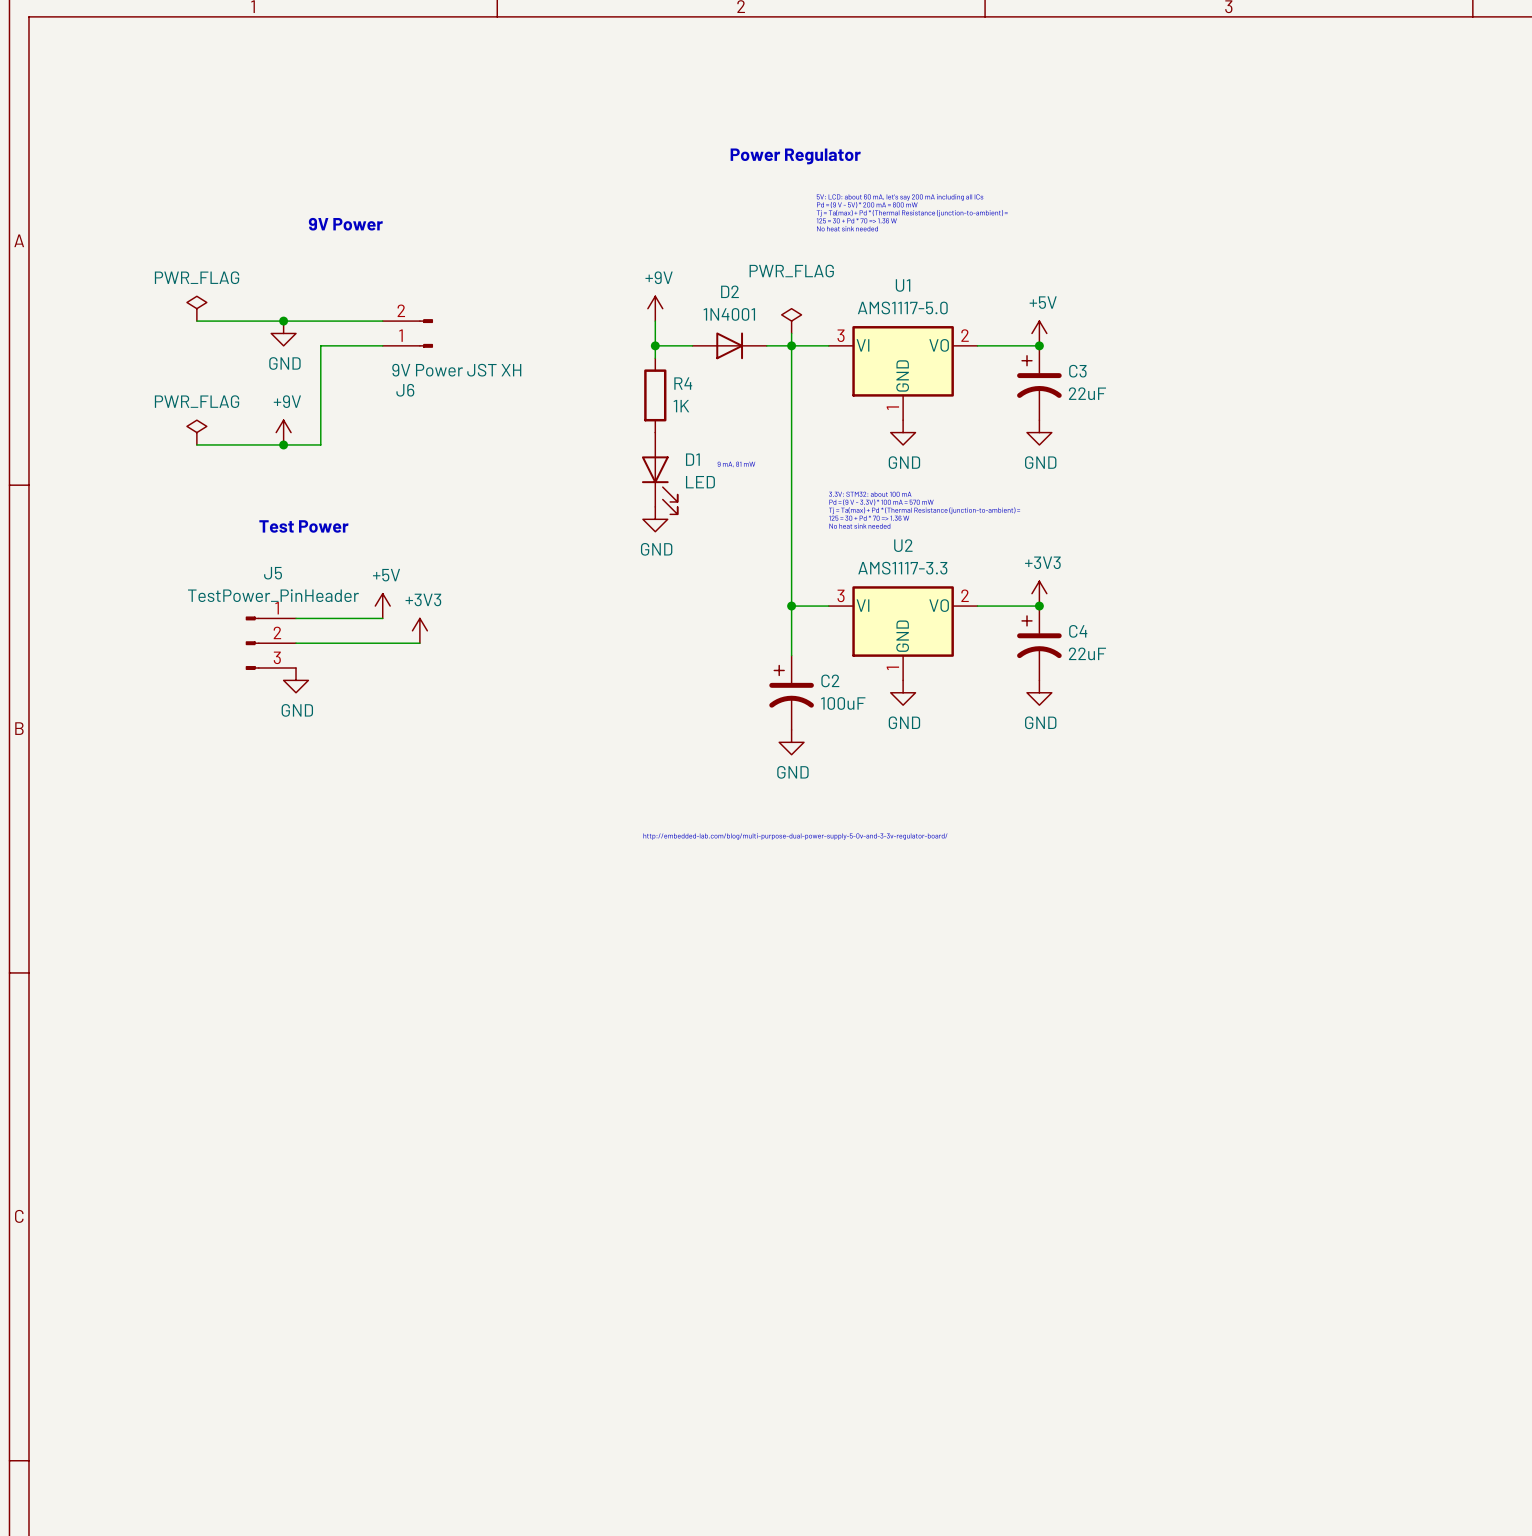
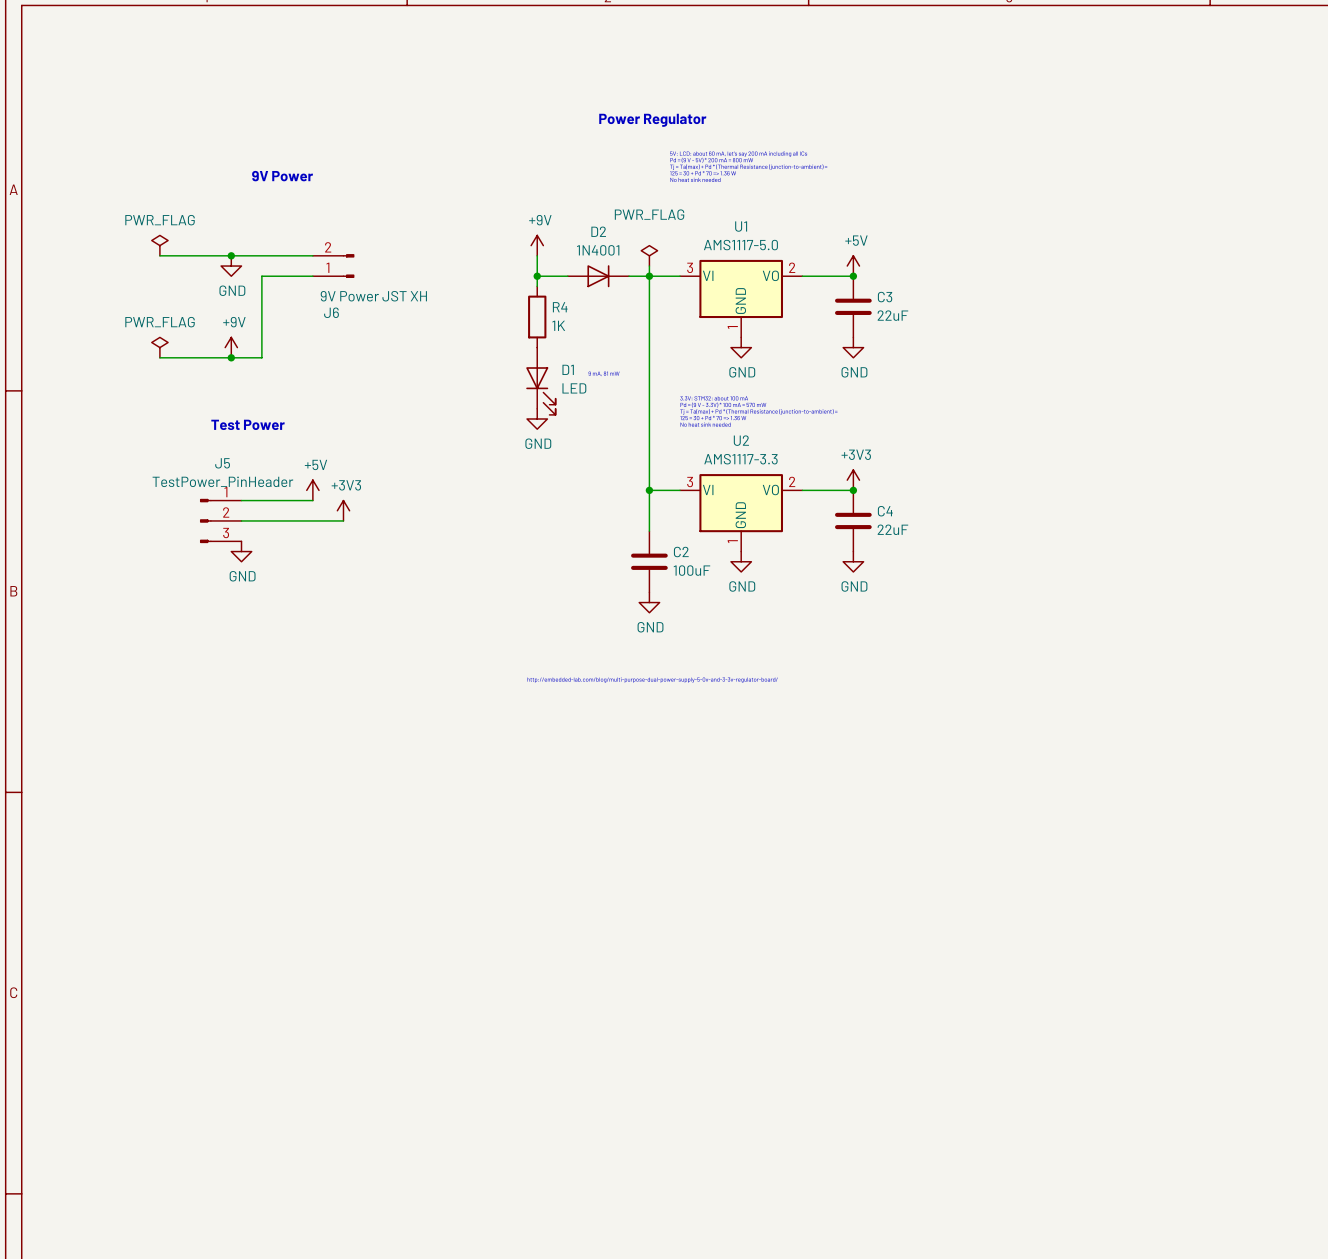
C3 symbol: [1017, 345, 1062, 421] -> [835, 276, 872, 338]
C4 symbol: [1017, 606, 1062, 681] -> [835, 490, 872, 552]
C2 symbol: [769, 655, 814, 730] -> [631, 531, 668, 593]

